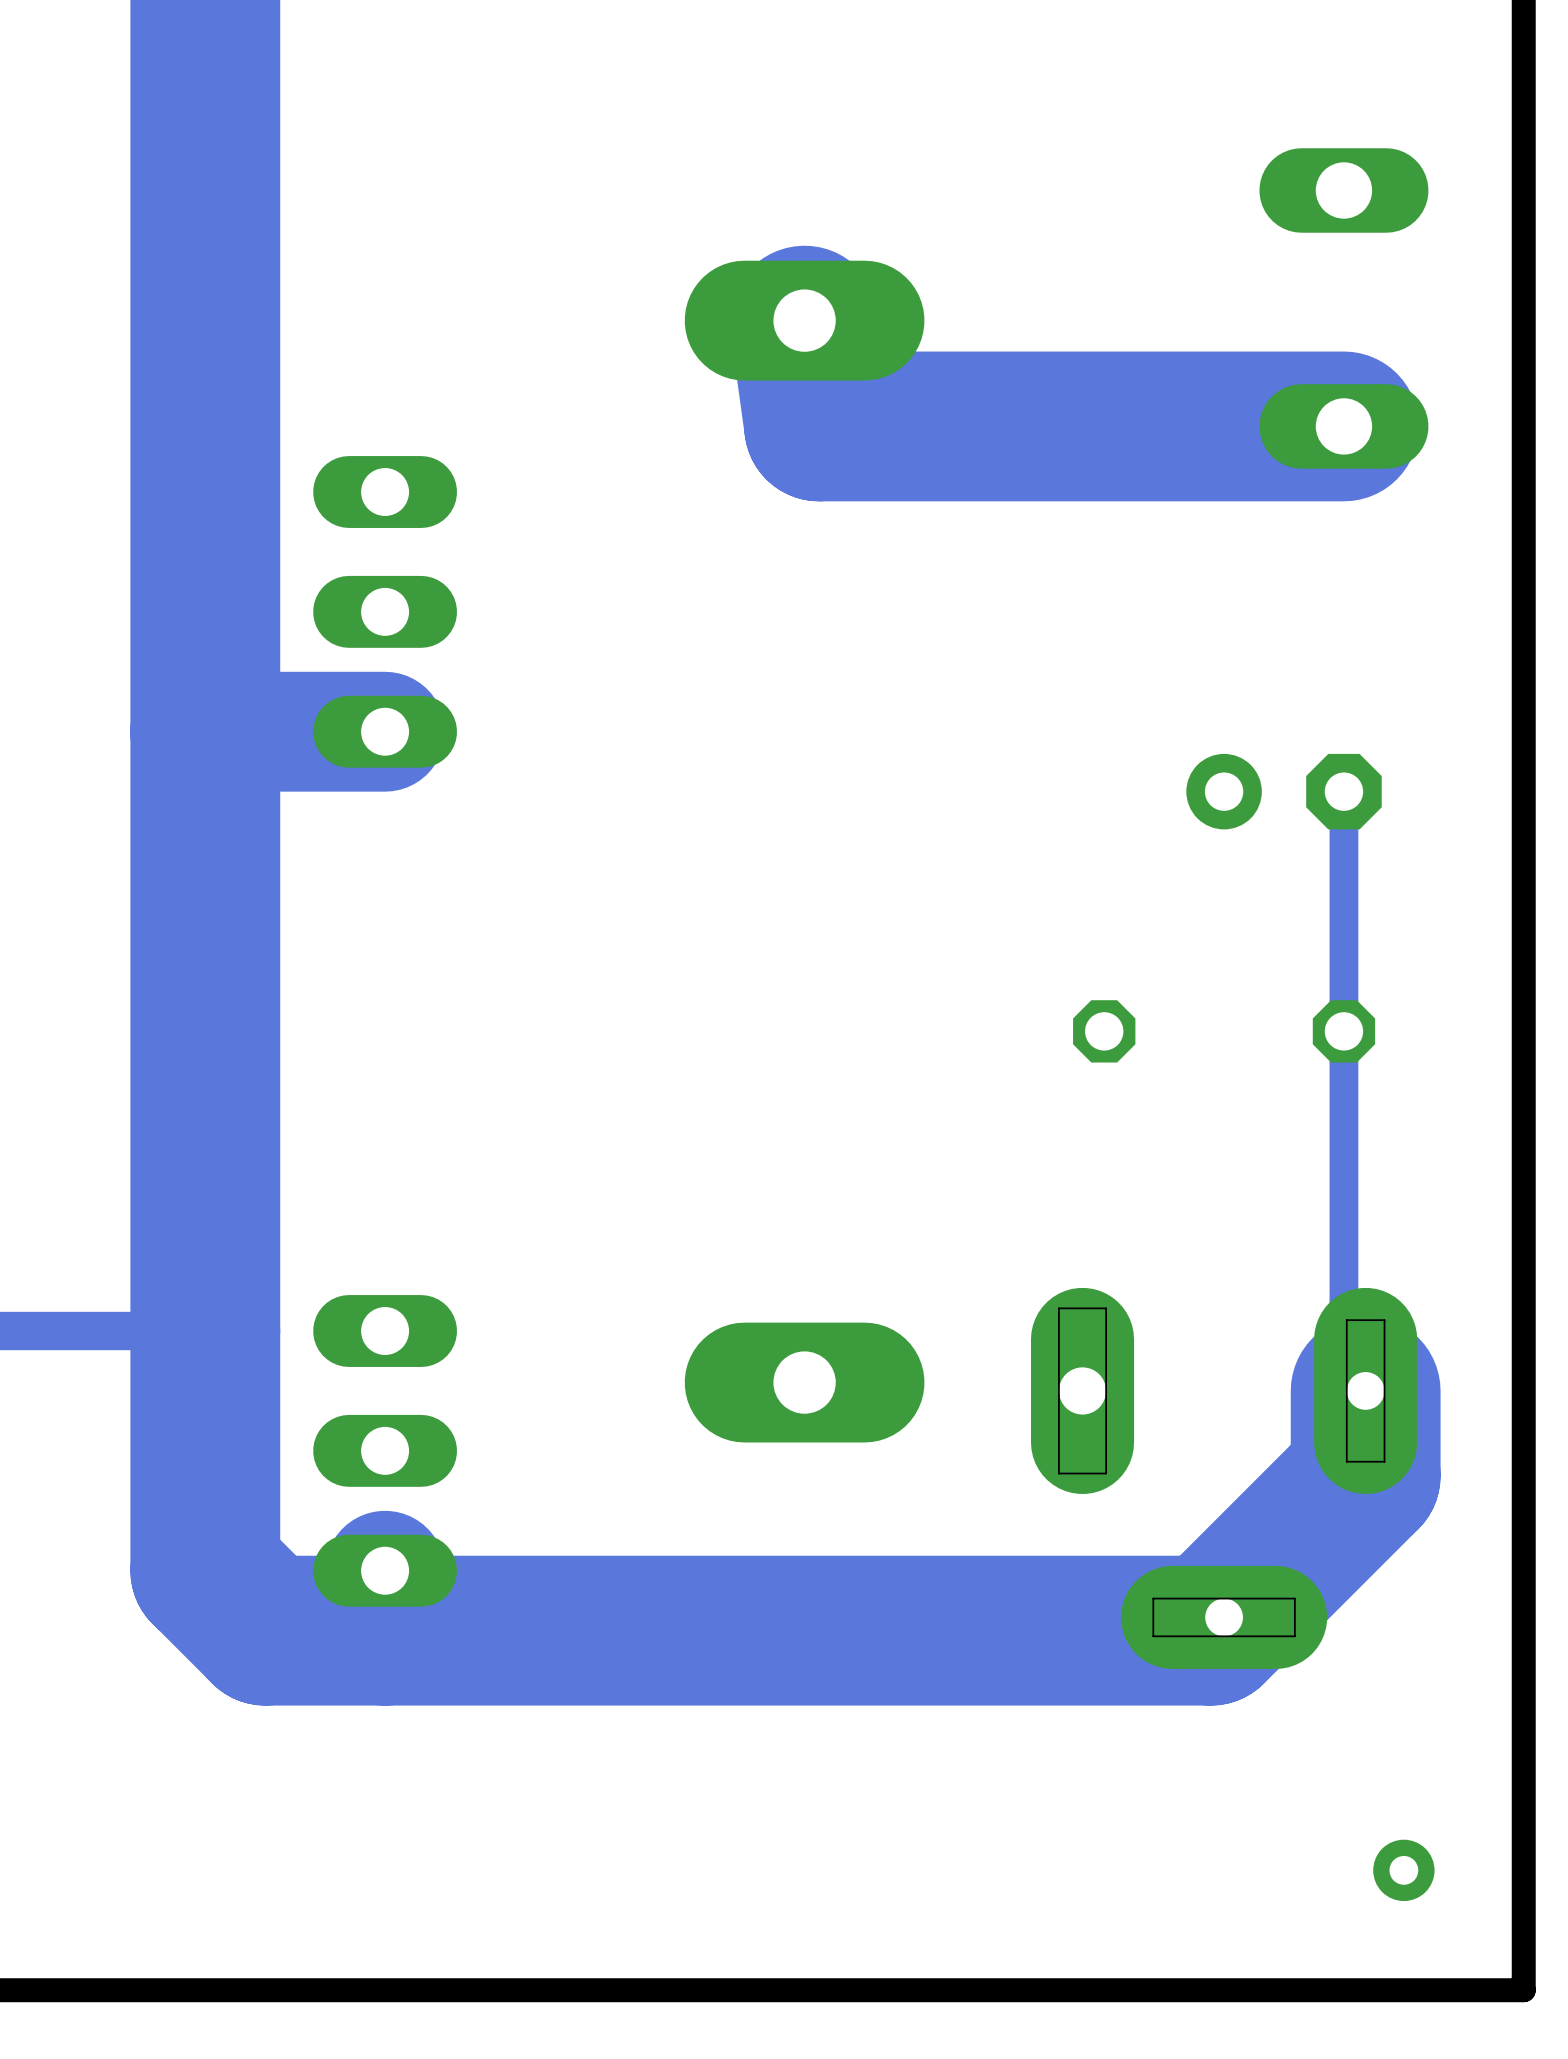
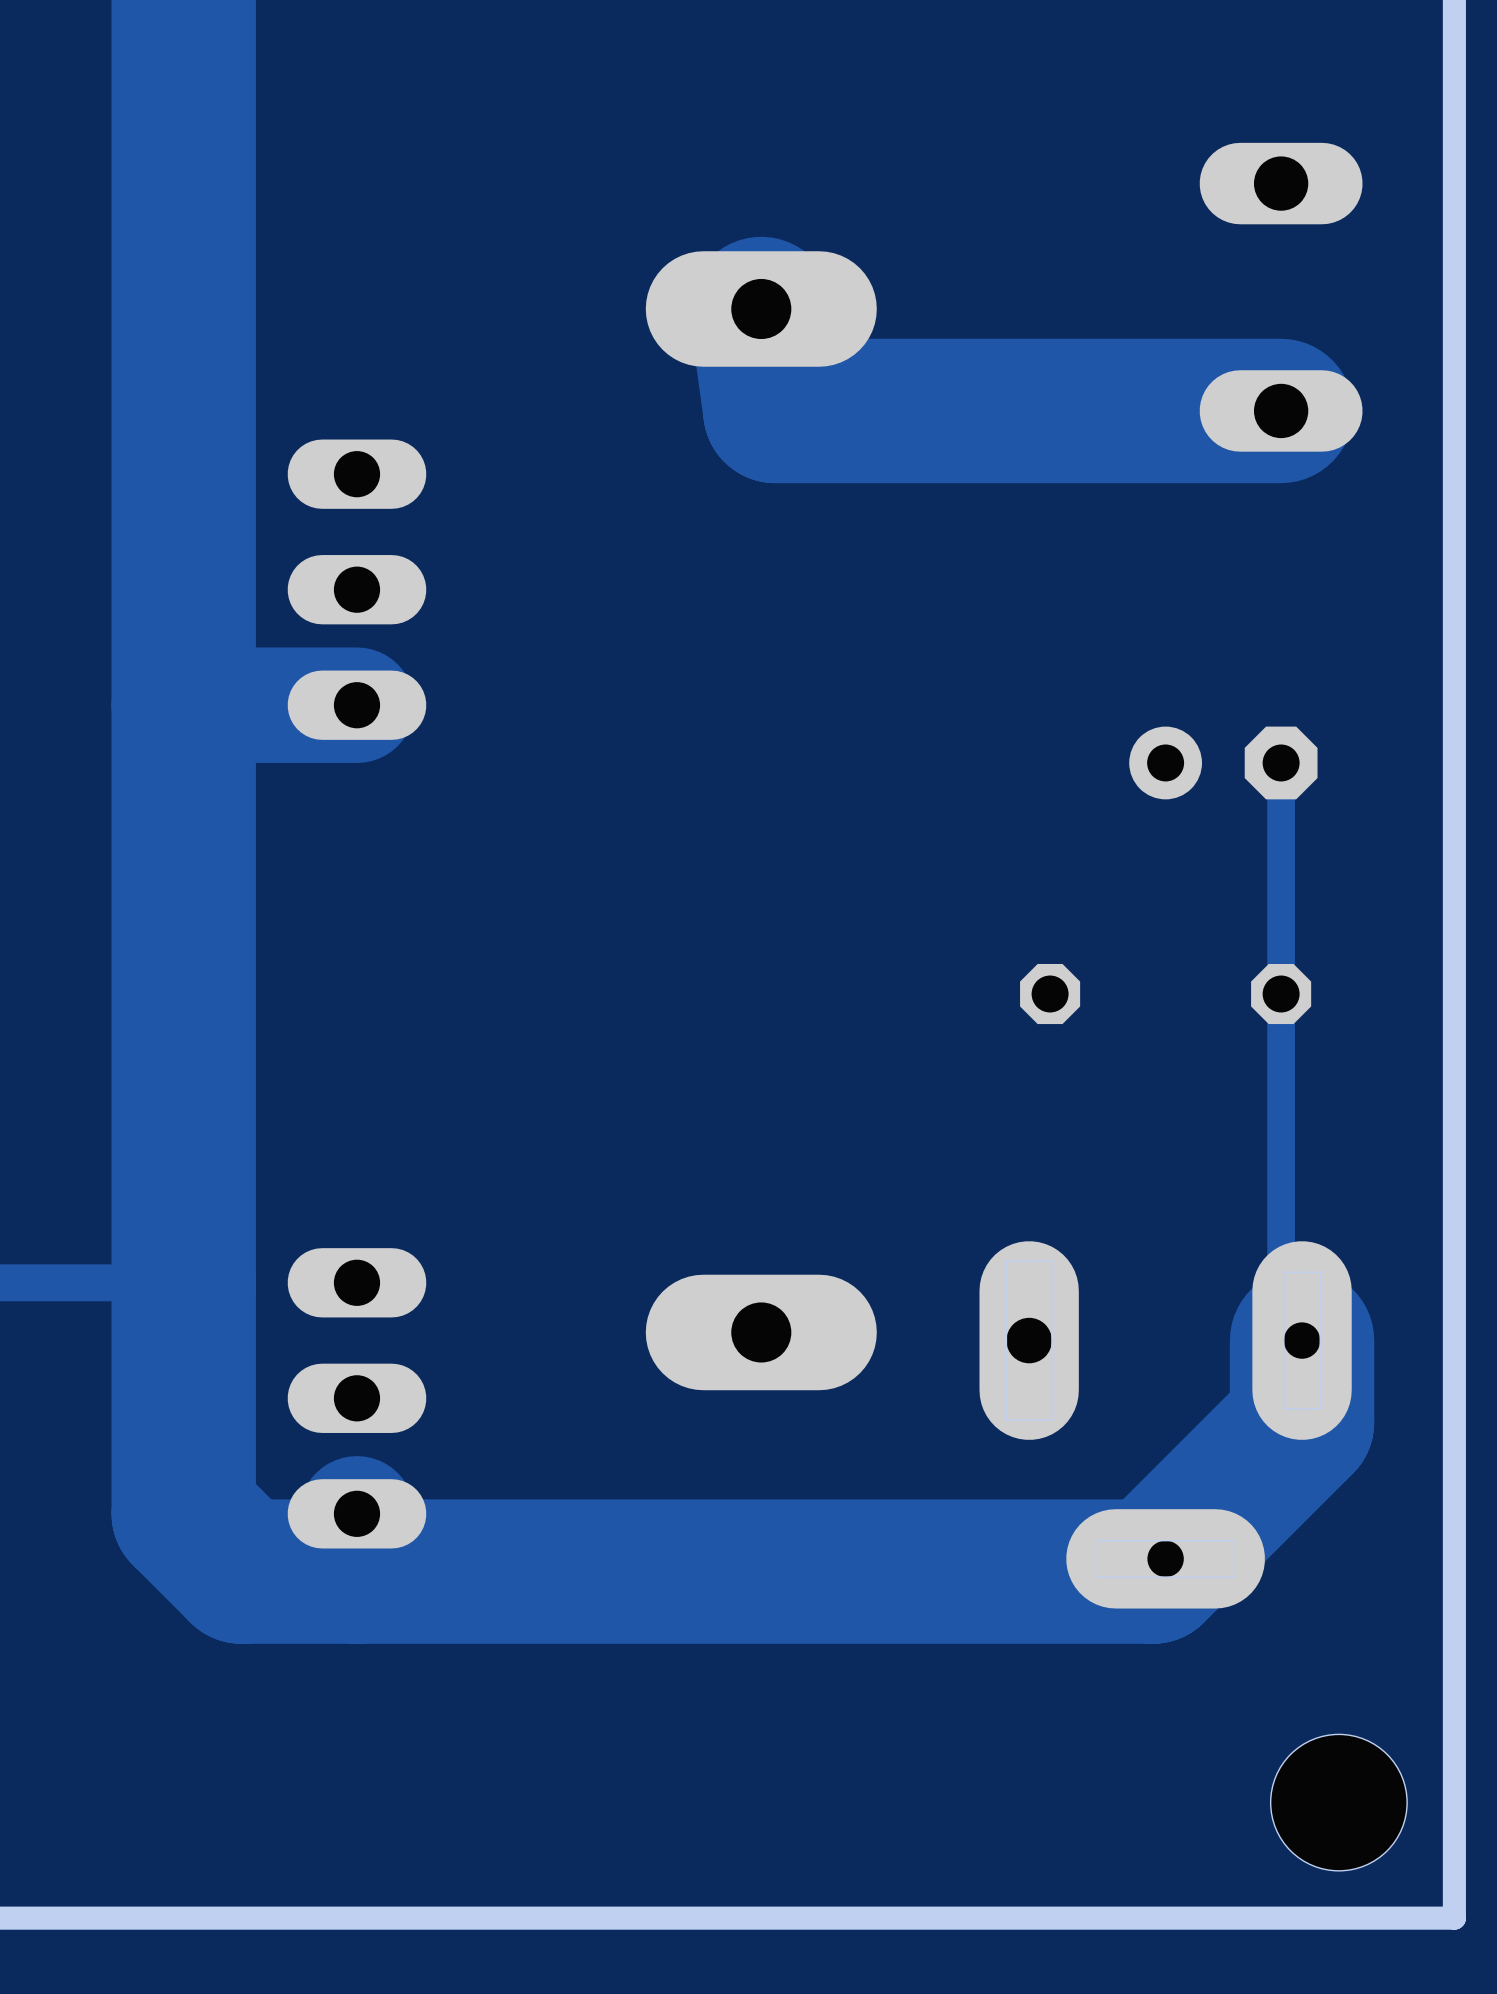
hole: none -> (1338, 1802)

